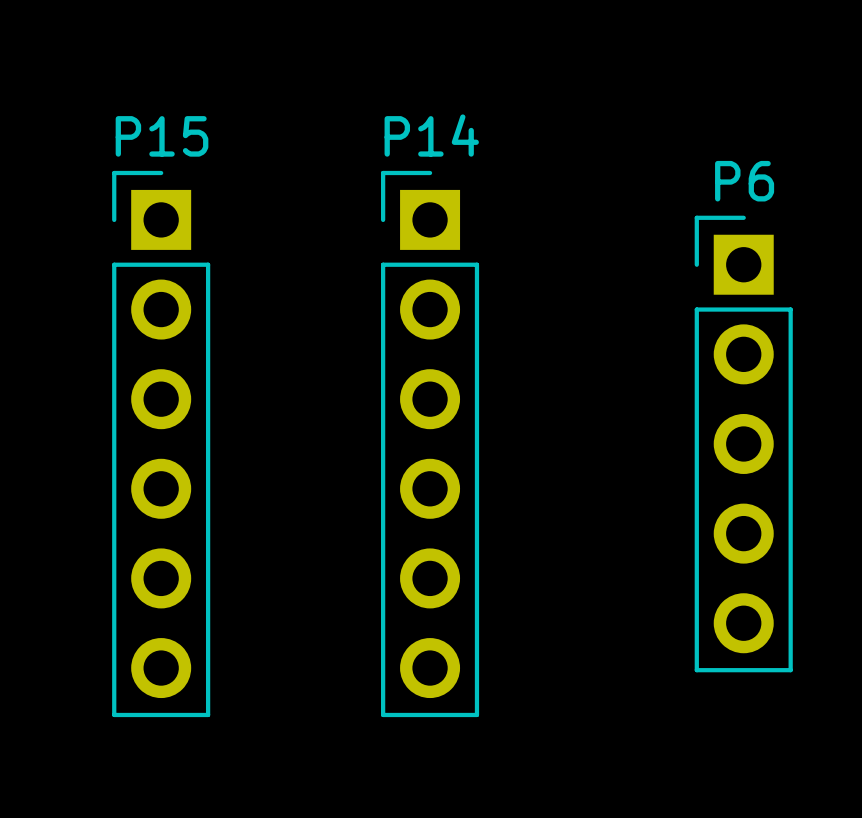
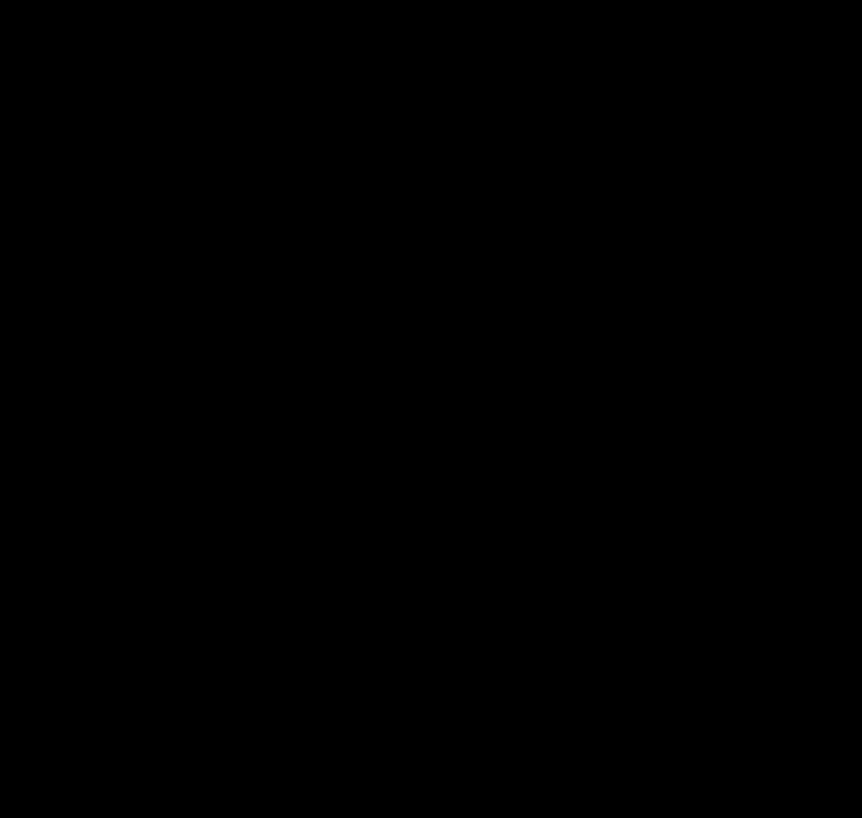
P15: (161, 443) -> none
P14: (430, 443) -> none
P6: (743, 443) -> none

